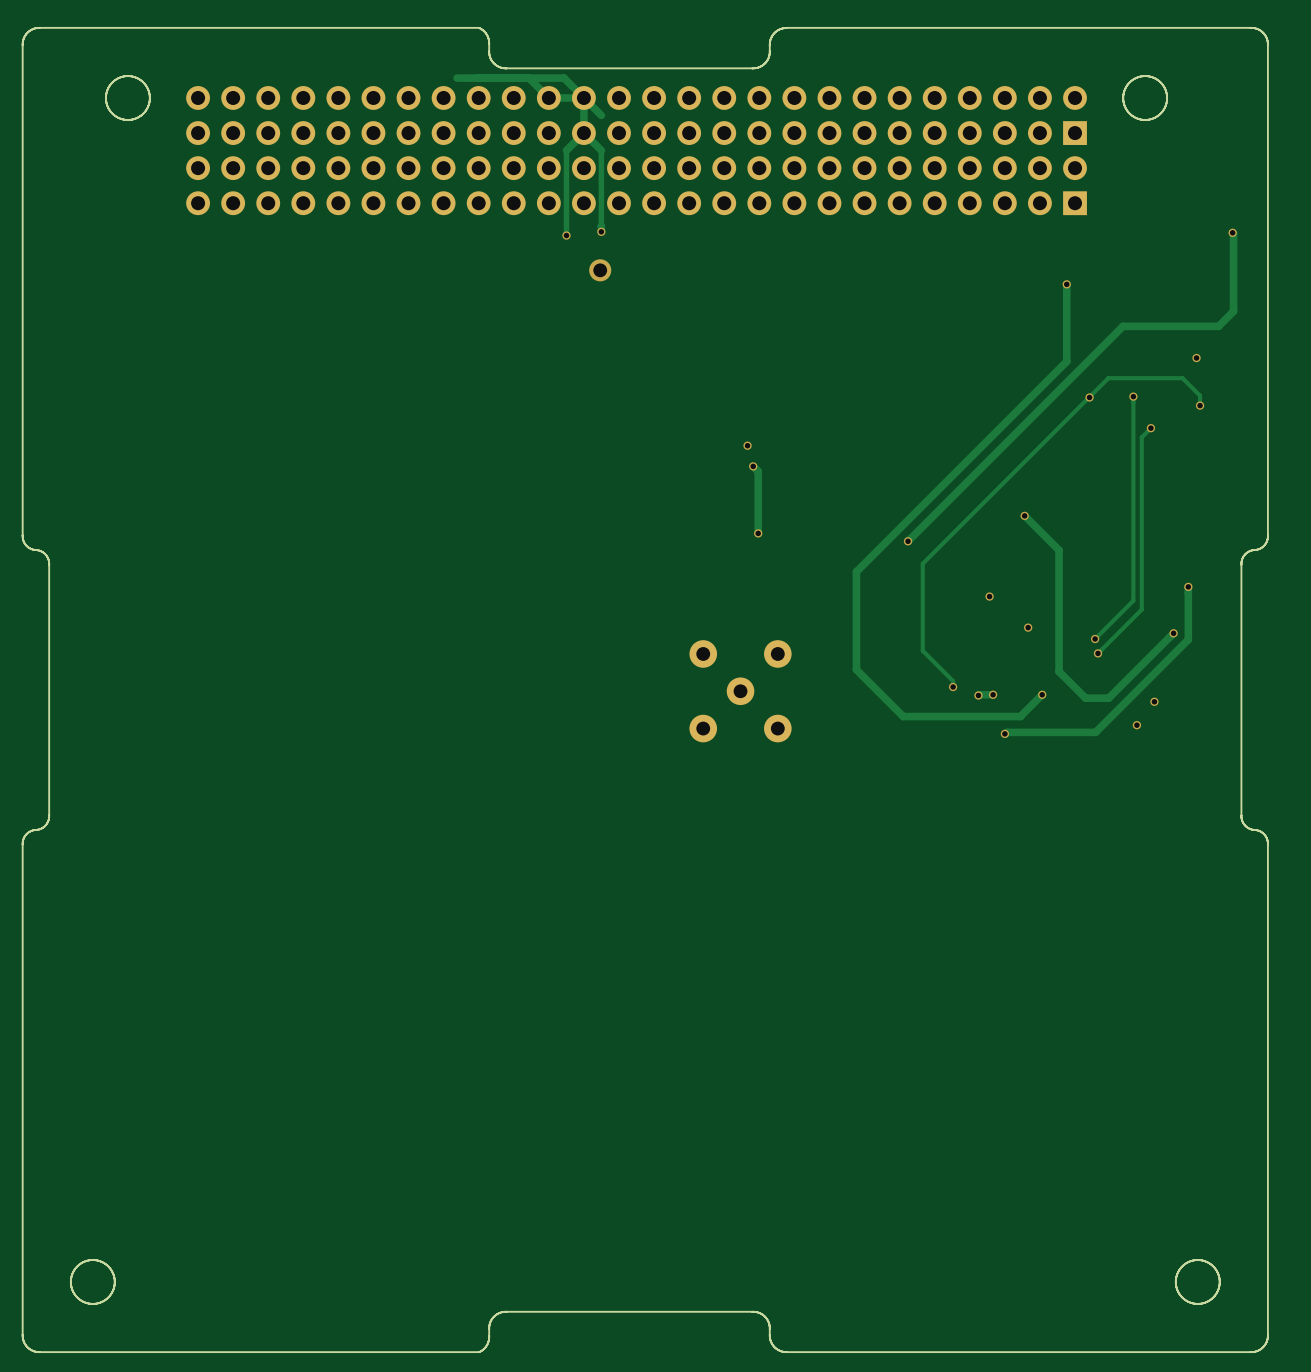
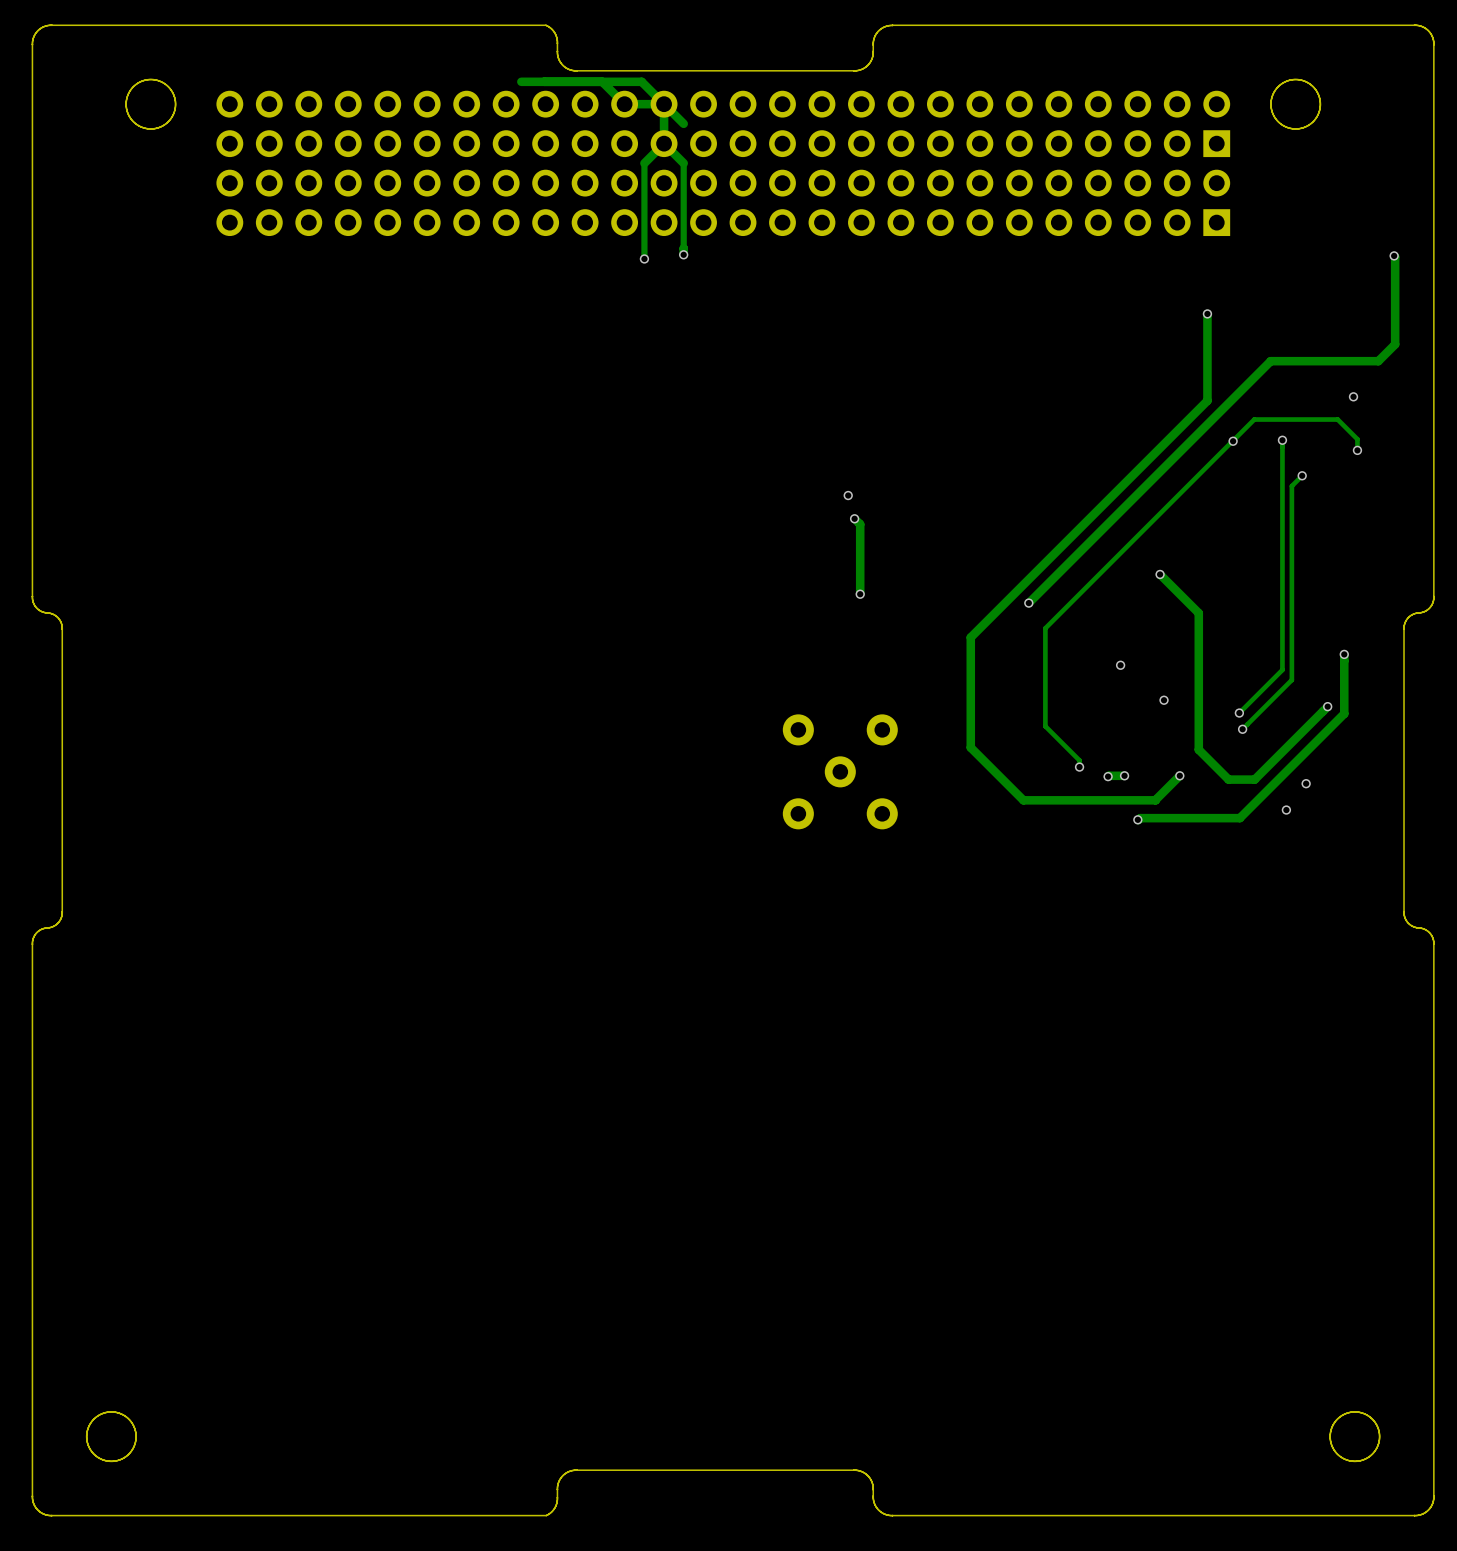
via: (600, 270) -> none

